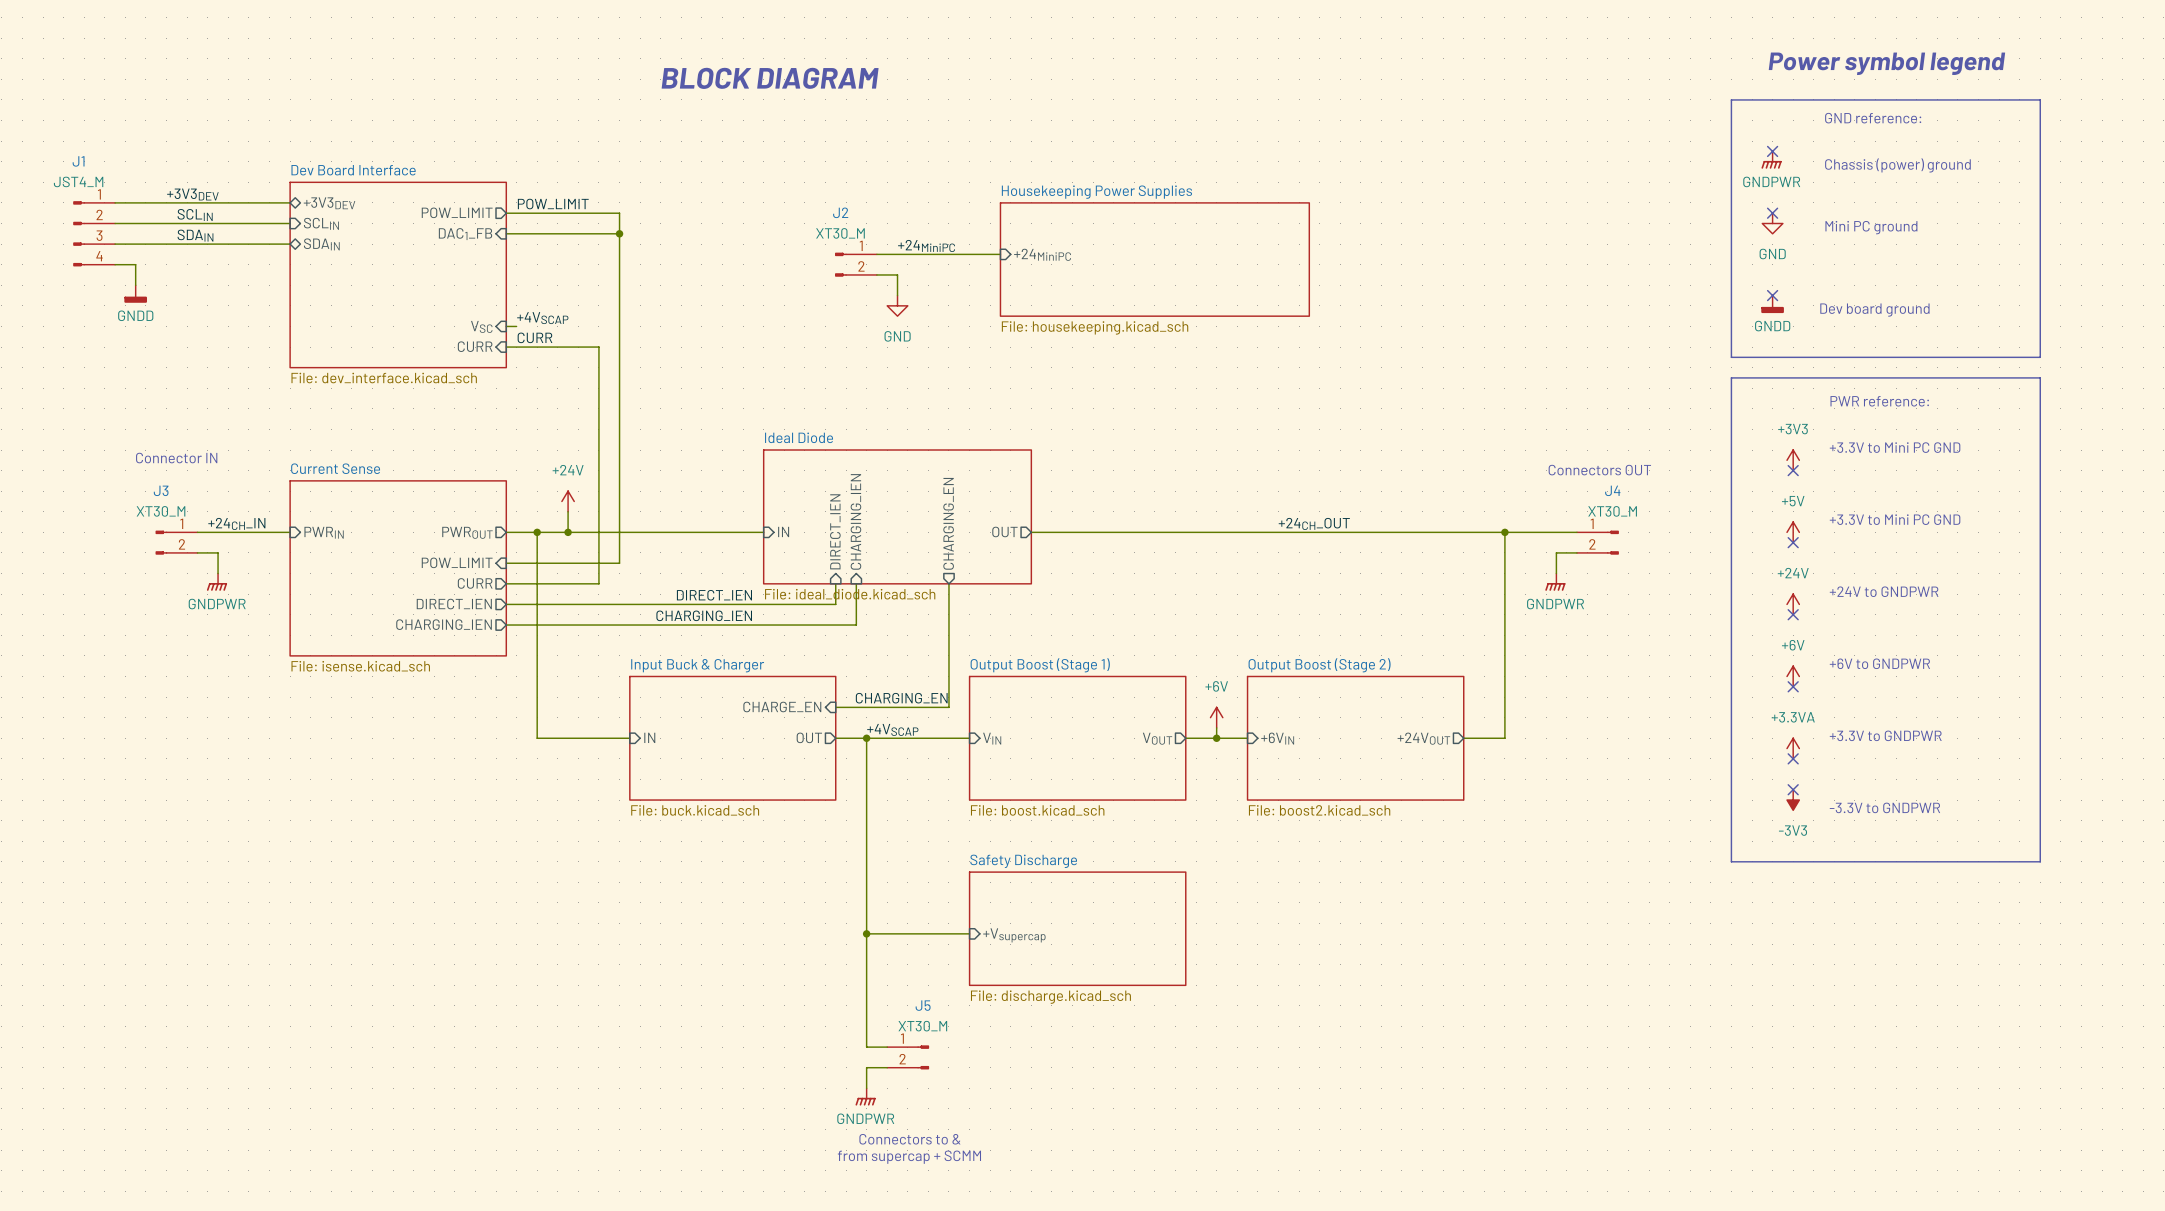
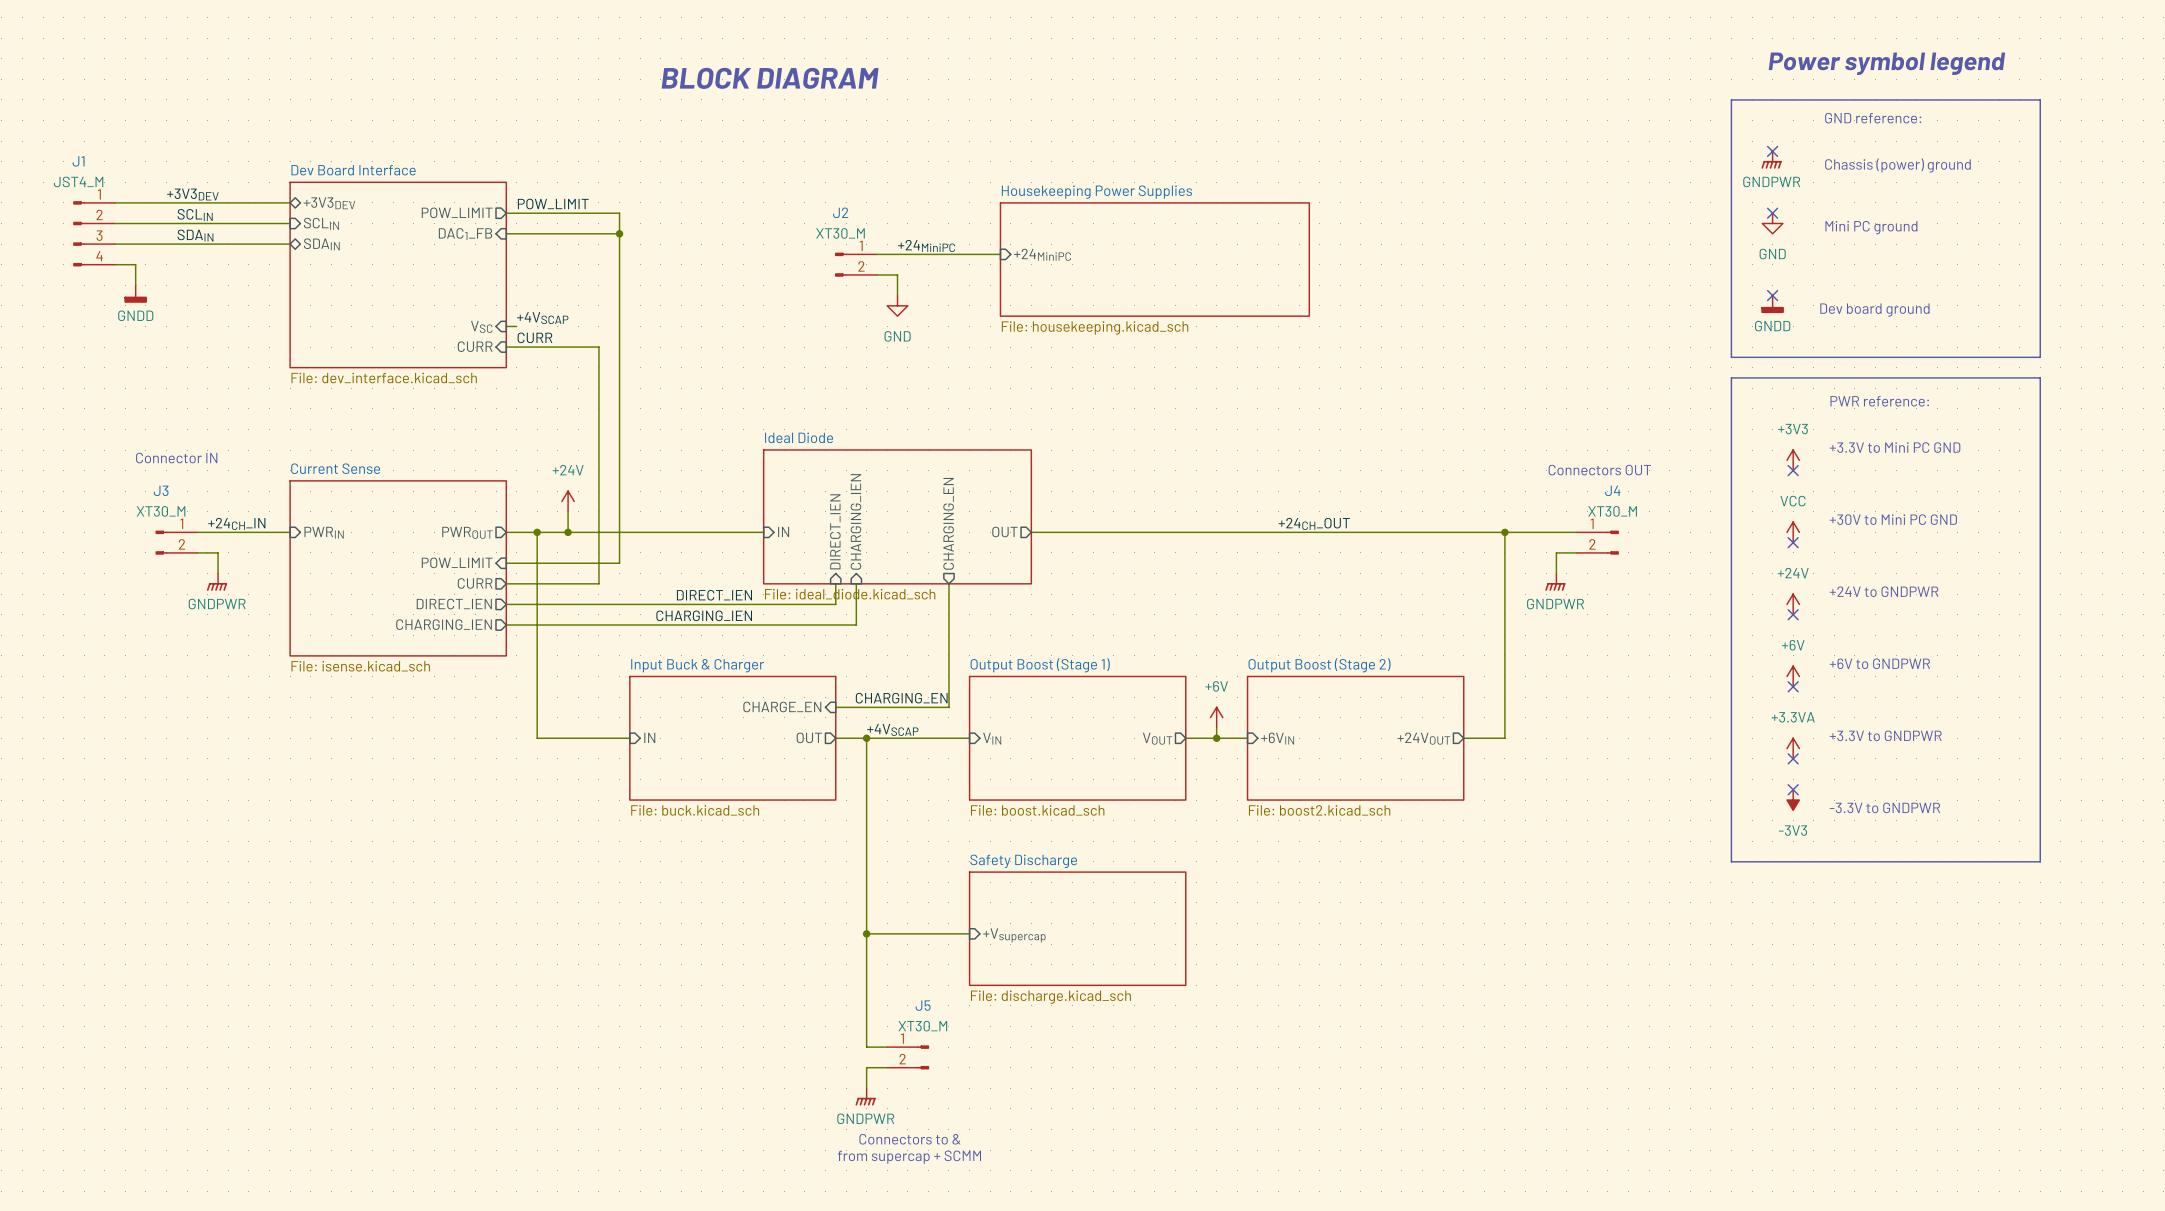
text: +3.3V to Mini PC GND (1895, 519) -> +30V to Mini PC GND (1893, 519)
power symbol: +5V (1793, 532) -> VCC (1793, 532)

